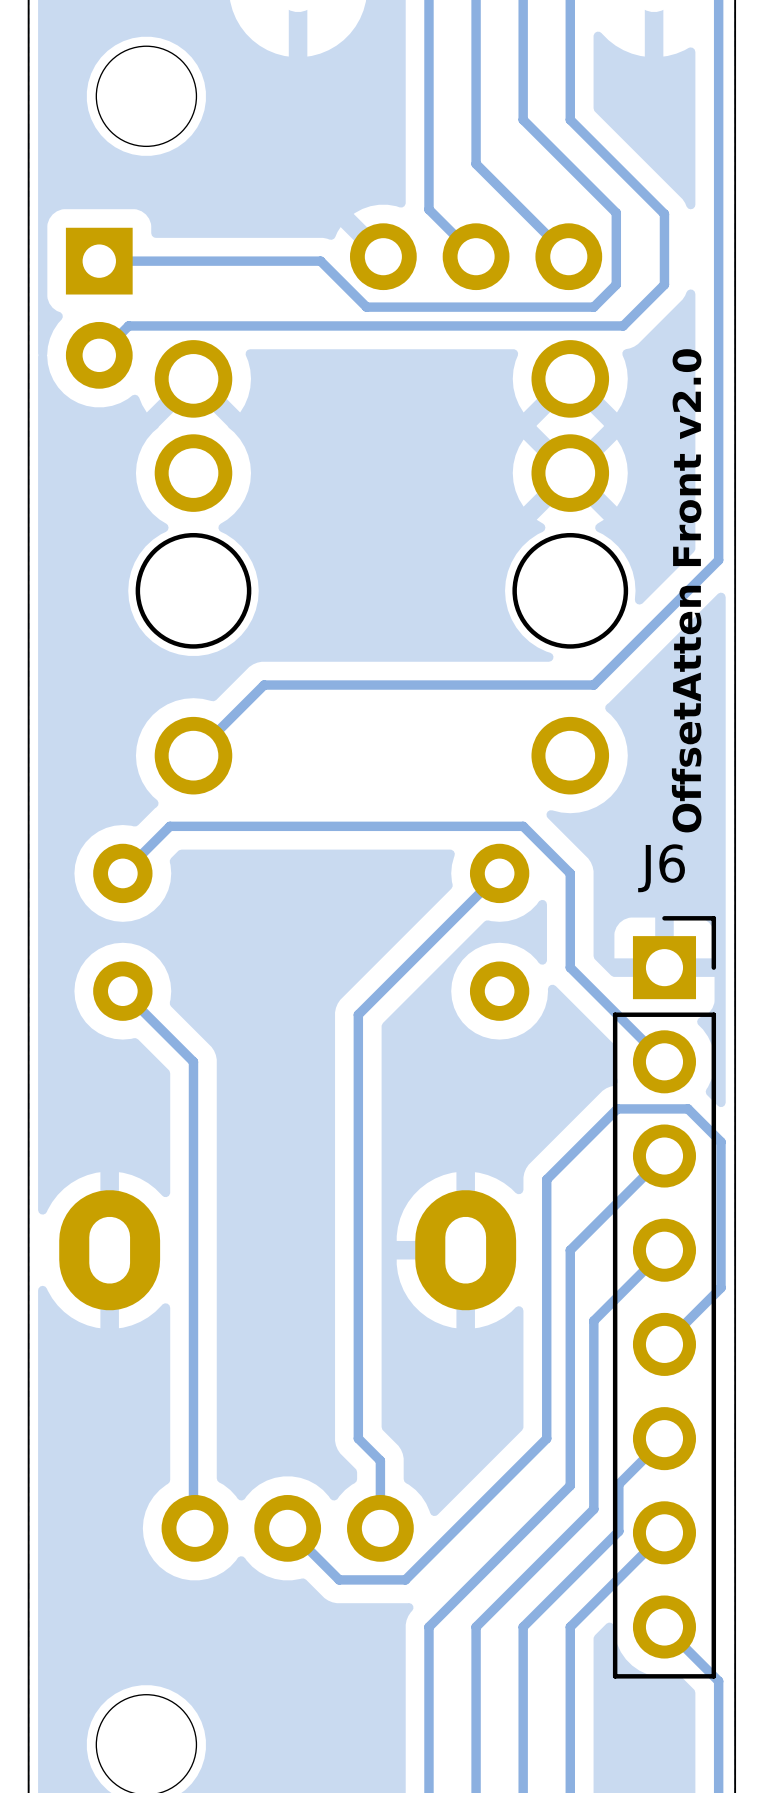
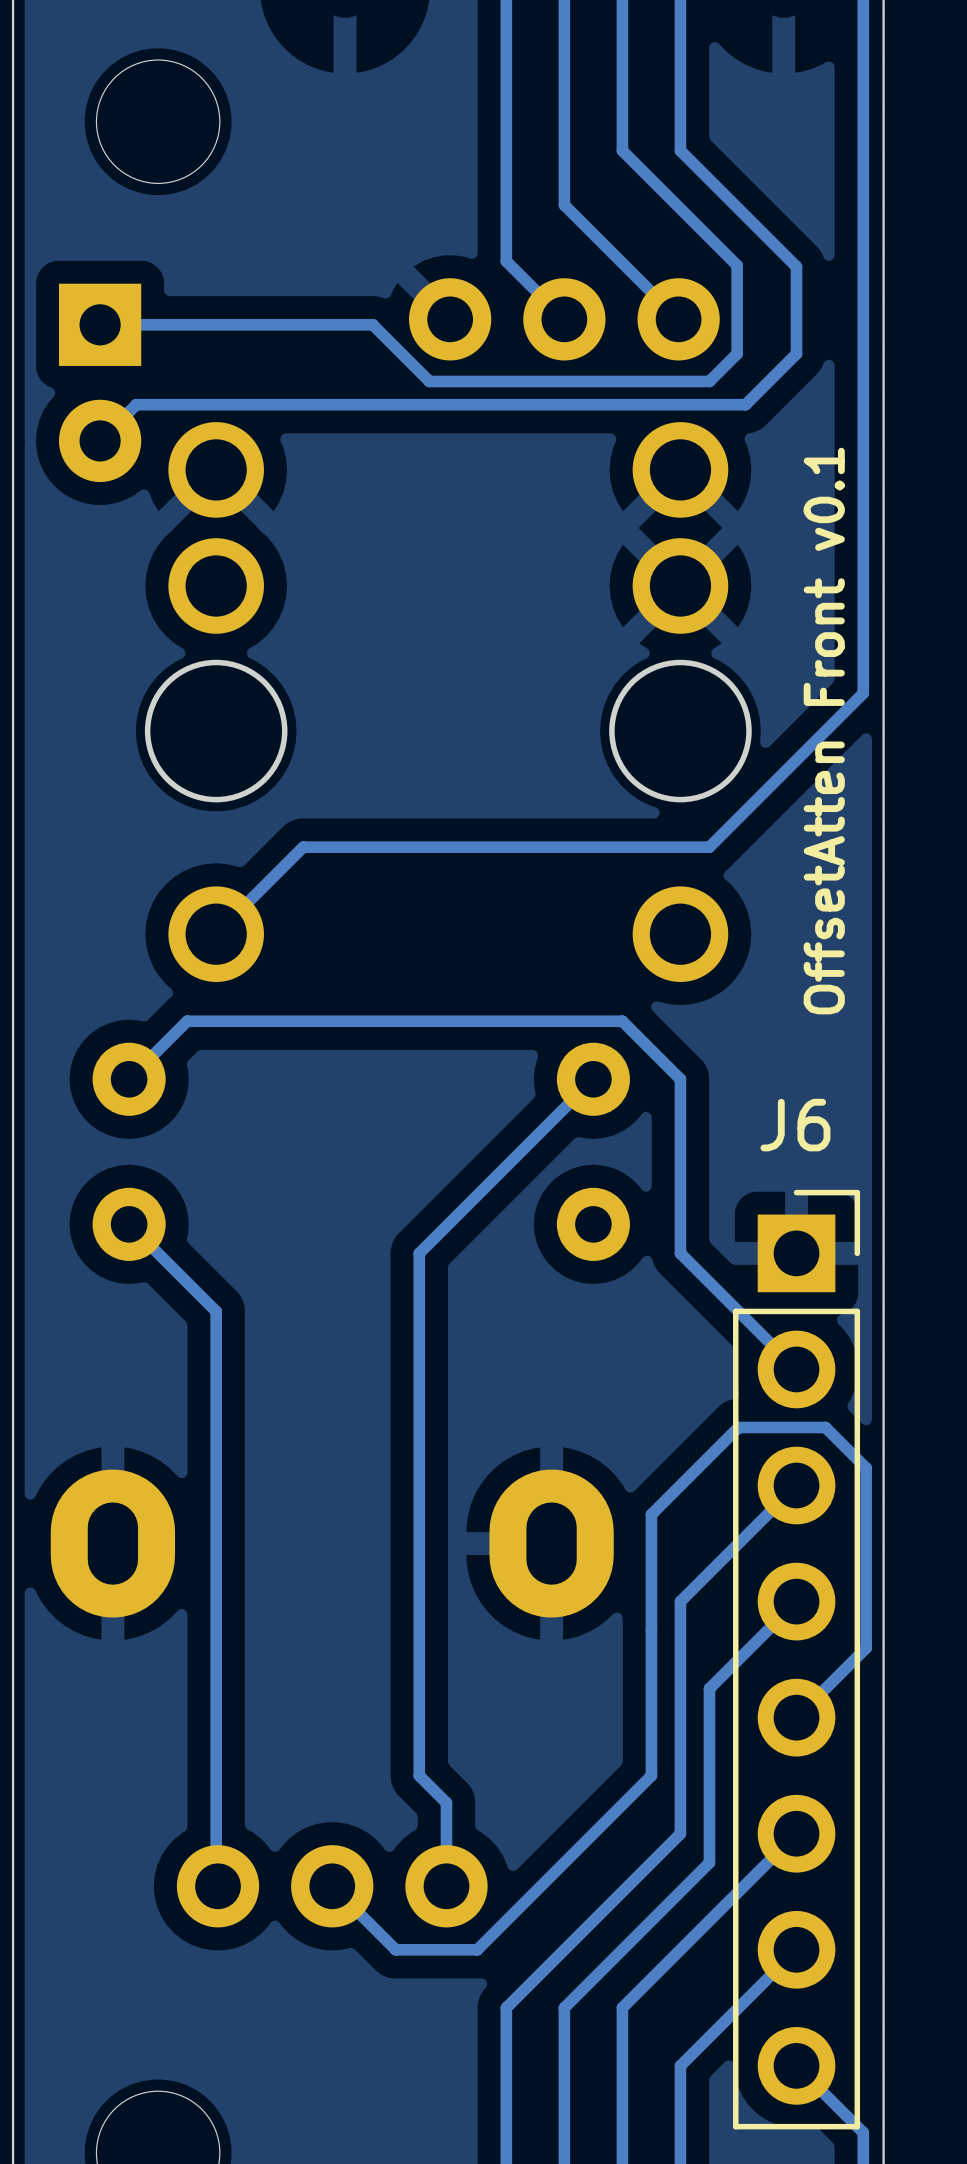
text: OffsetAtten Front v2.0 (686, 590) -> OffsetAtten Front v0.1 (824, 731)
track: (570, 967) (664, 1061) -> (680, 1195) (680, 1253) (796, 1369)
track: (664, 1156) (570, 1250) (570, 1297) -> (796, 1485) (680, 1601)
track: (720, 1188) (720, 1141) (688, 1108) (617, 1108) (546, 1179) (546, 1226) -> (866, 1468) (825, 1427) (738, 1427) (651, 1514)
track: (664, 1250) (593, 1320) (593, 1367) -> (796, 1601) (709, 1688)
track: (720, 1287) (664, 1344) -> (866, 1589) (866, 1648) (796, 1717)
J6 position: (664, 1297) -> (796, 1659)
track: (664, 1438) (618, 1484) (618, 1531) -> (796, 1833) (740, 1889)
track: (664, 1532) (570, 1627) (570, 1674) -> (796, 1949) (680, 2065)
track: (664, 1627) (718, 1681) (718, 1728) -> (796, 2065) (863, 2132)

